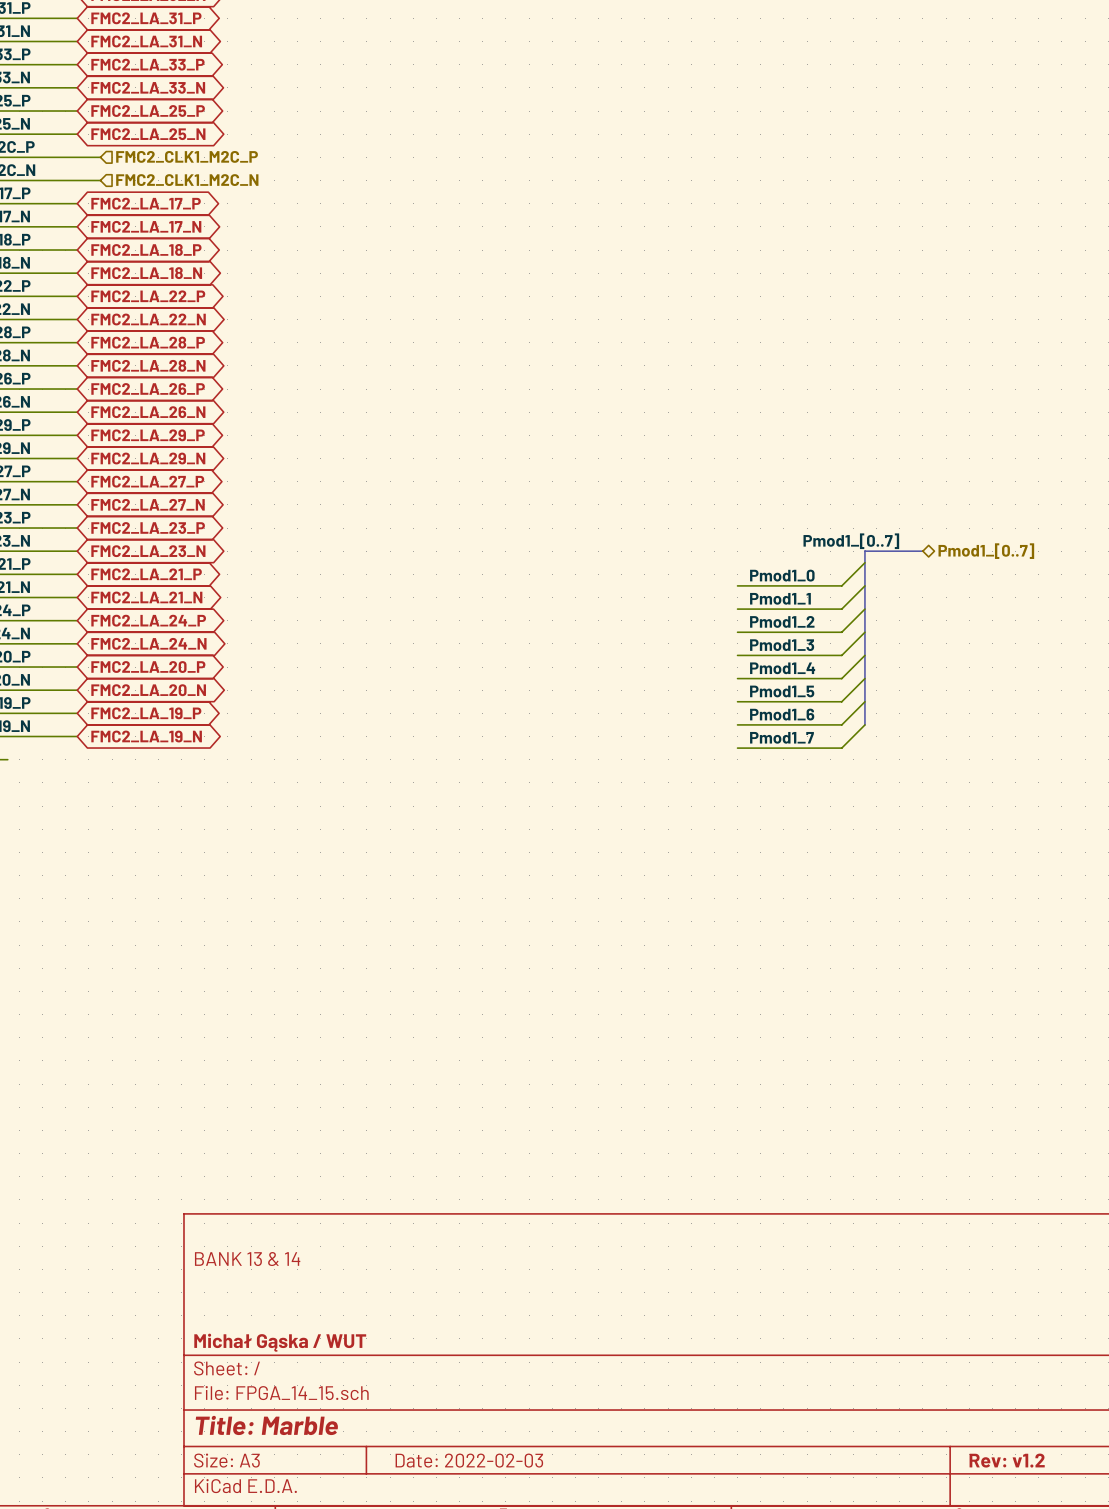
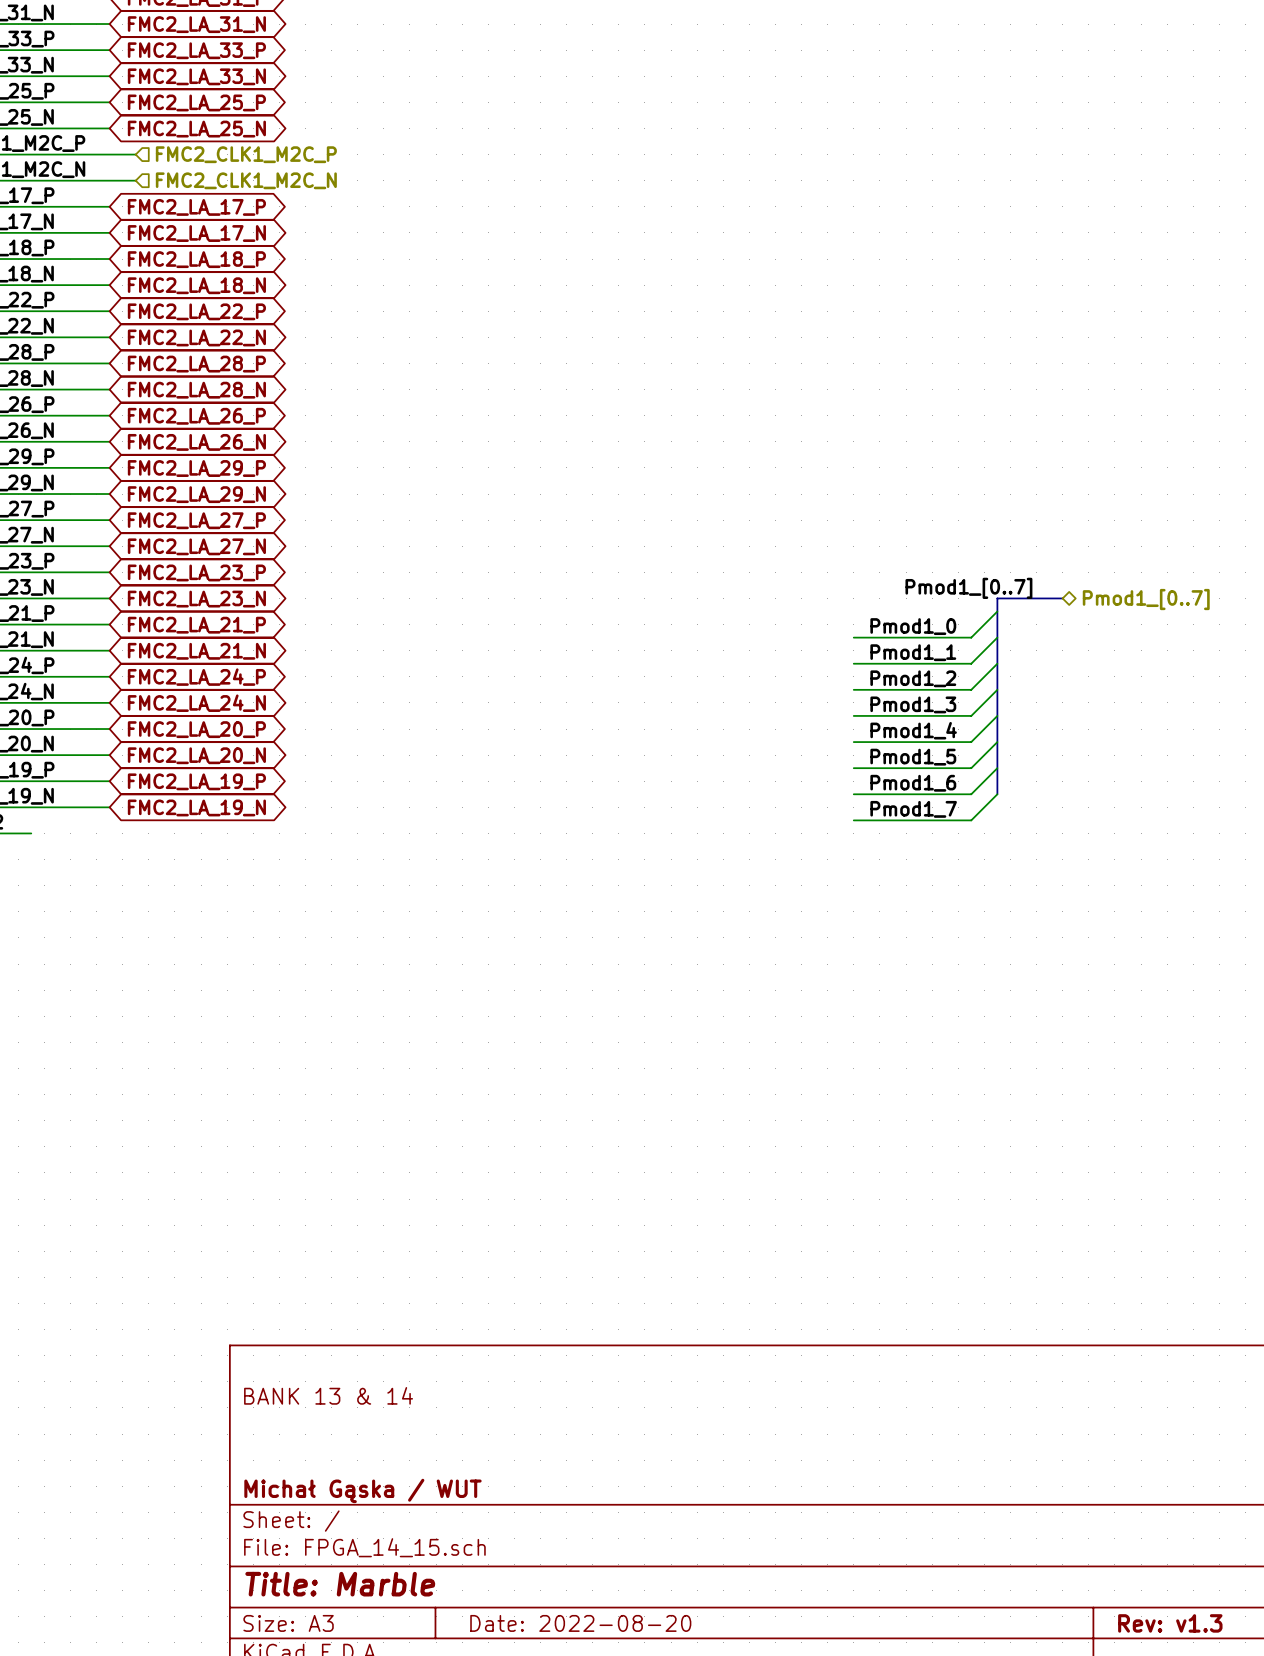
title block: Date: 2022-02-03 (469, 1460) -> Date: 2022-08-20 (580, 1623)
title block: Rev: v1.2 (1007, 1460) -> Rev: v1.3 (1170, 1623)

